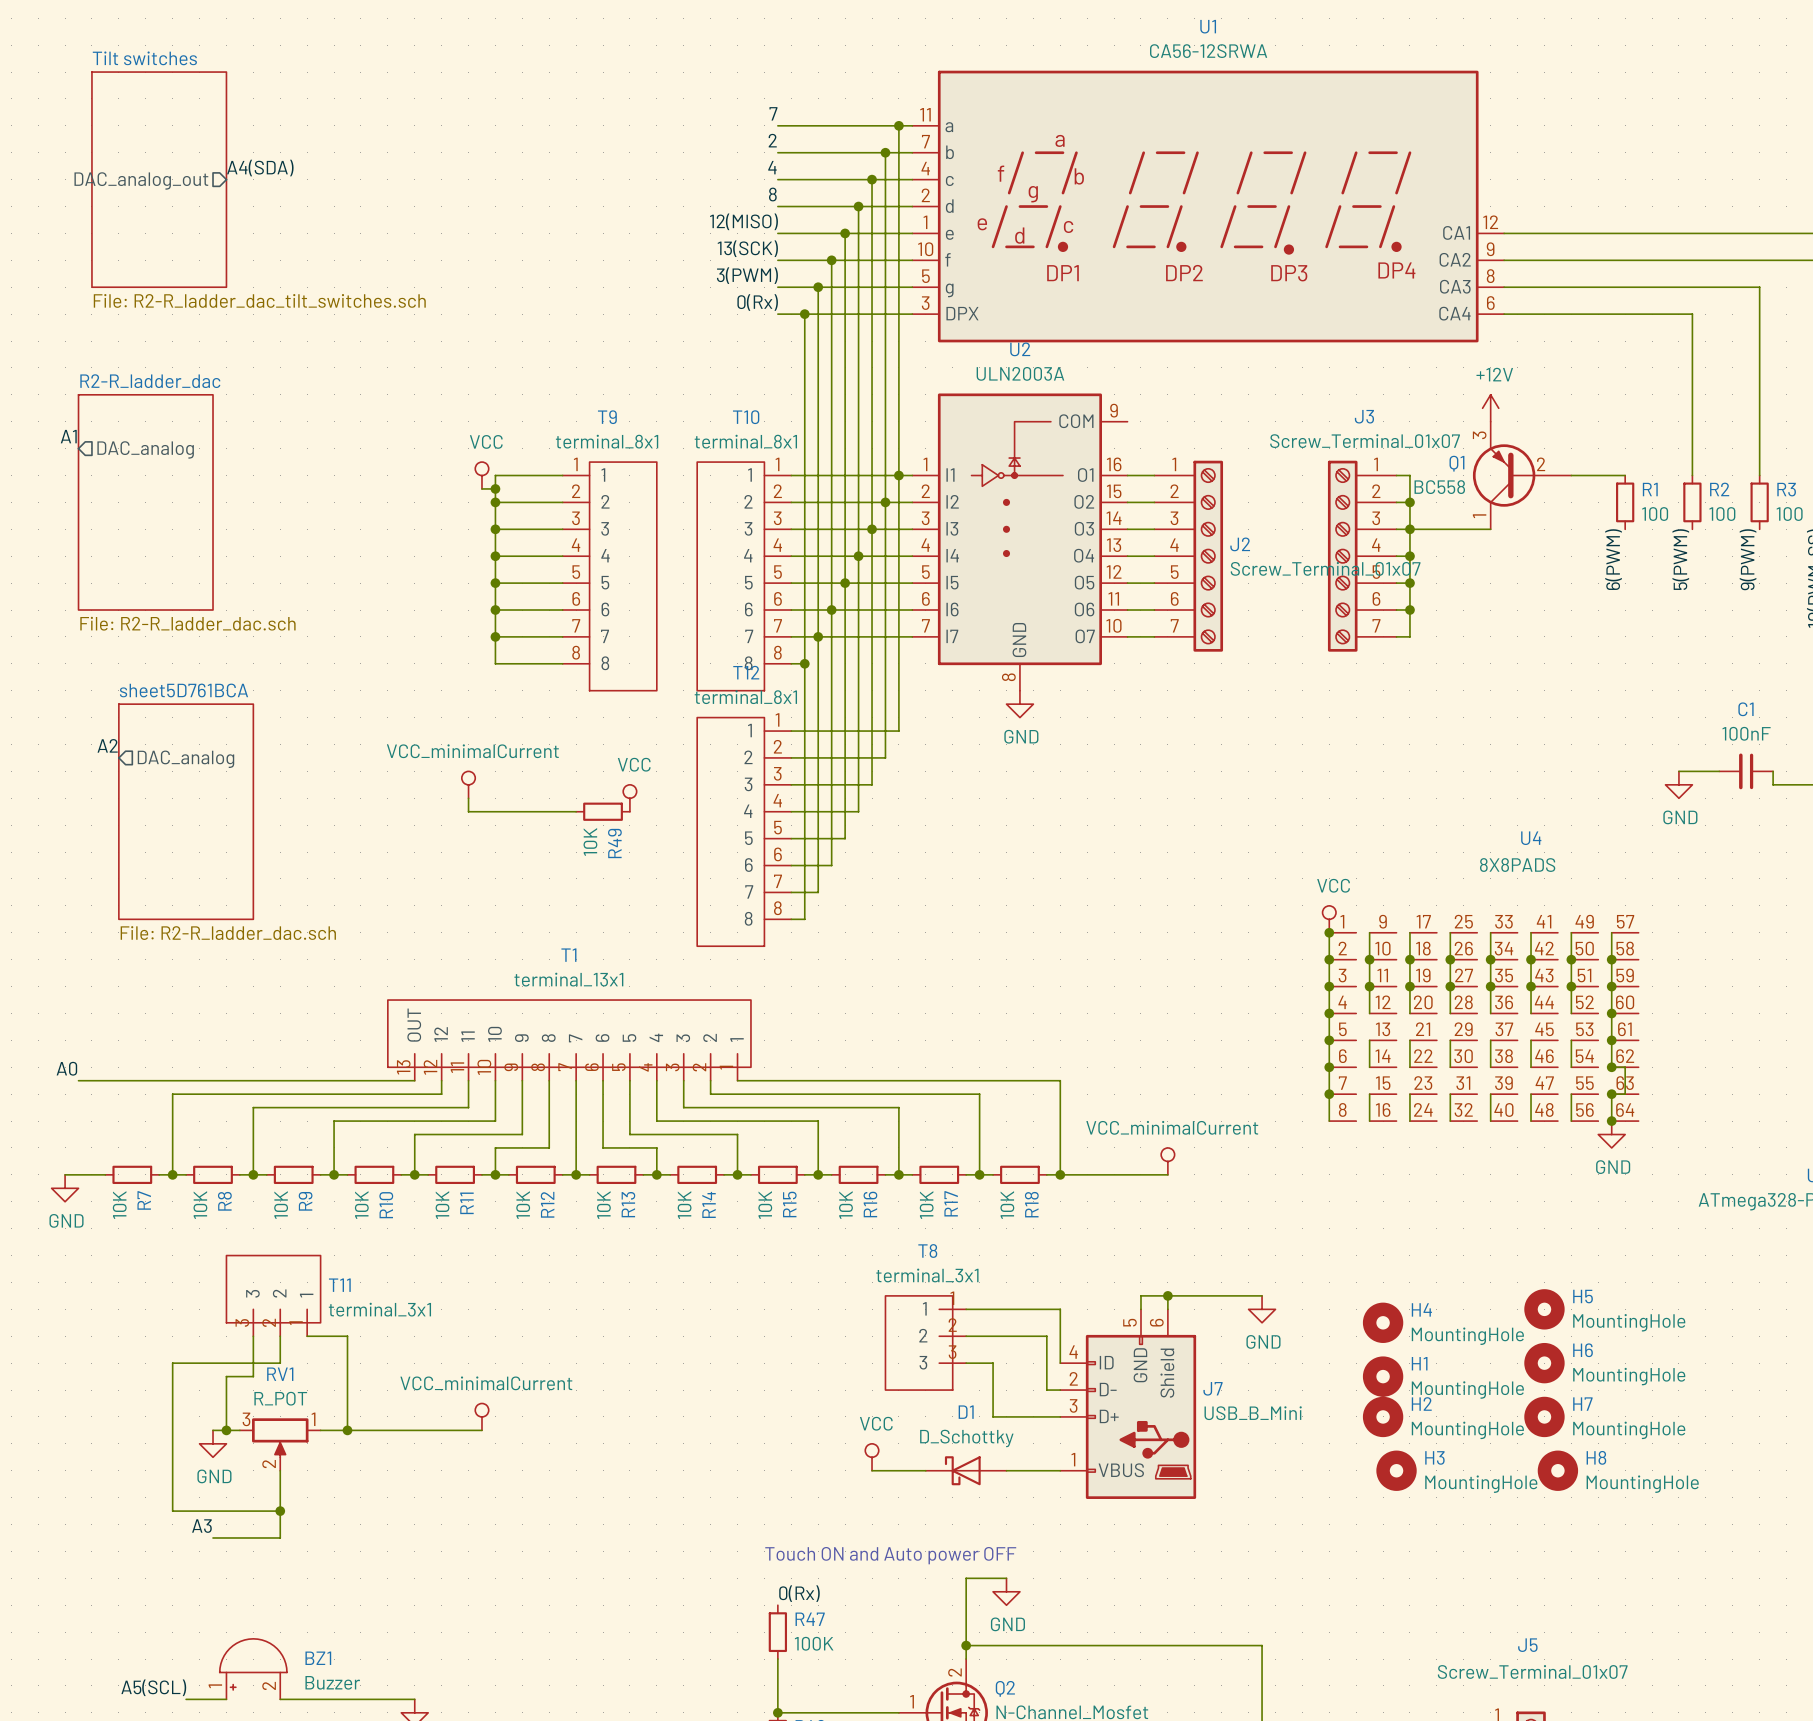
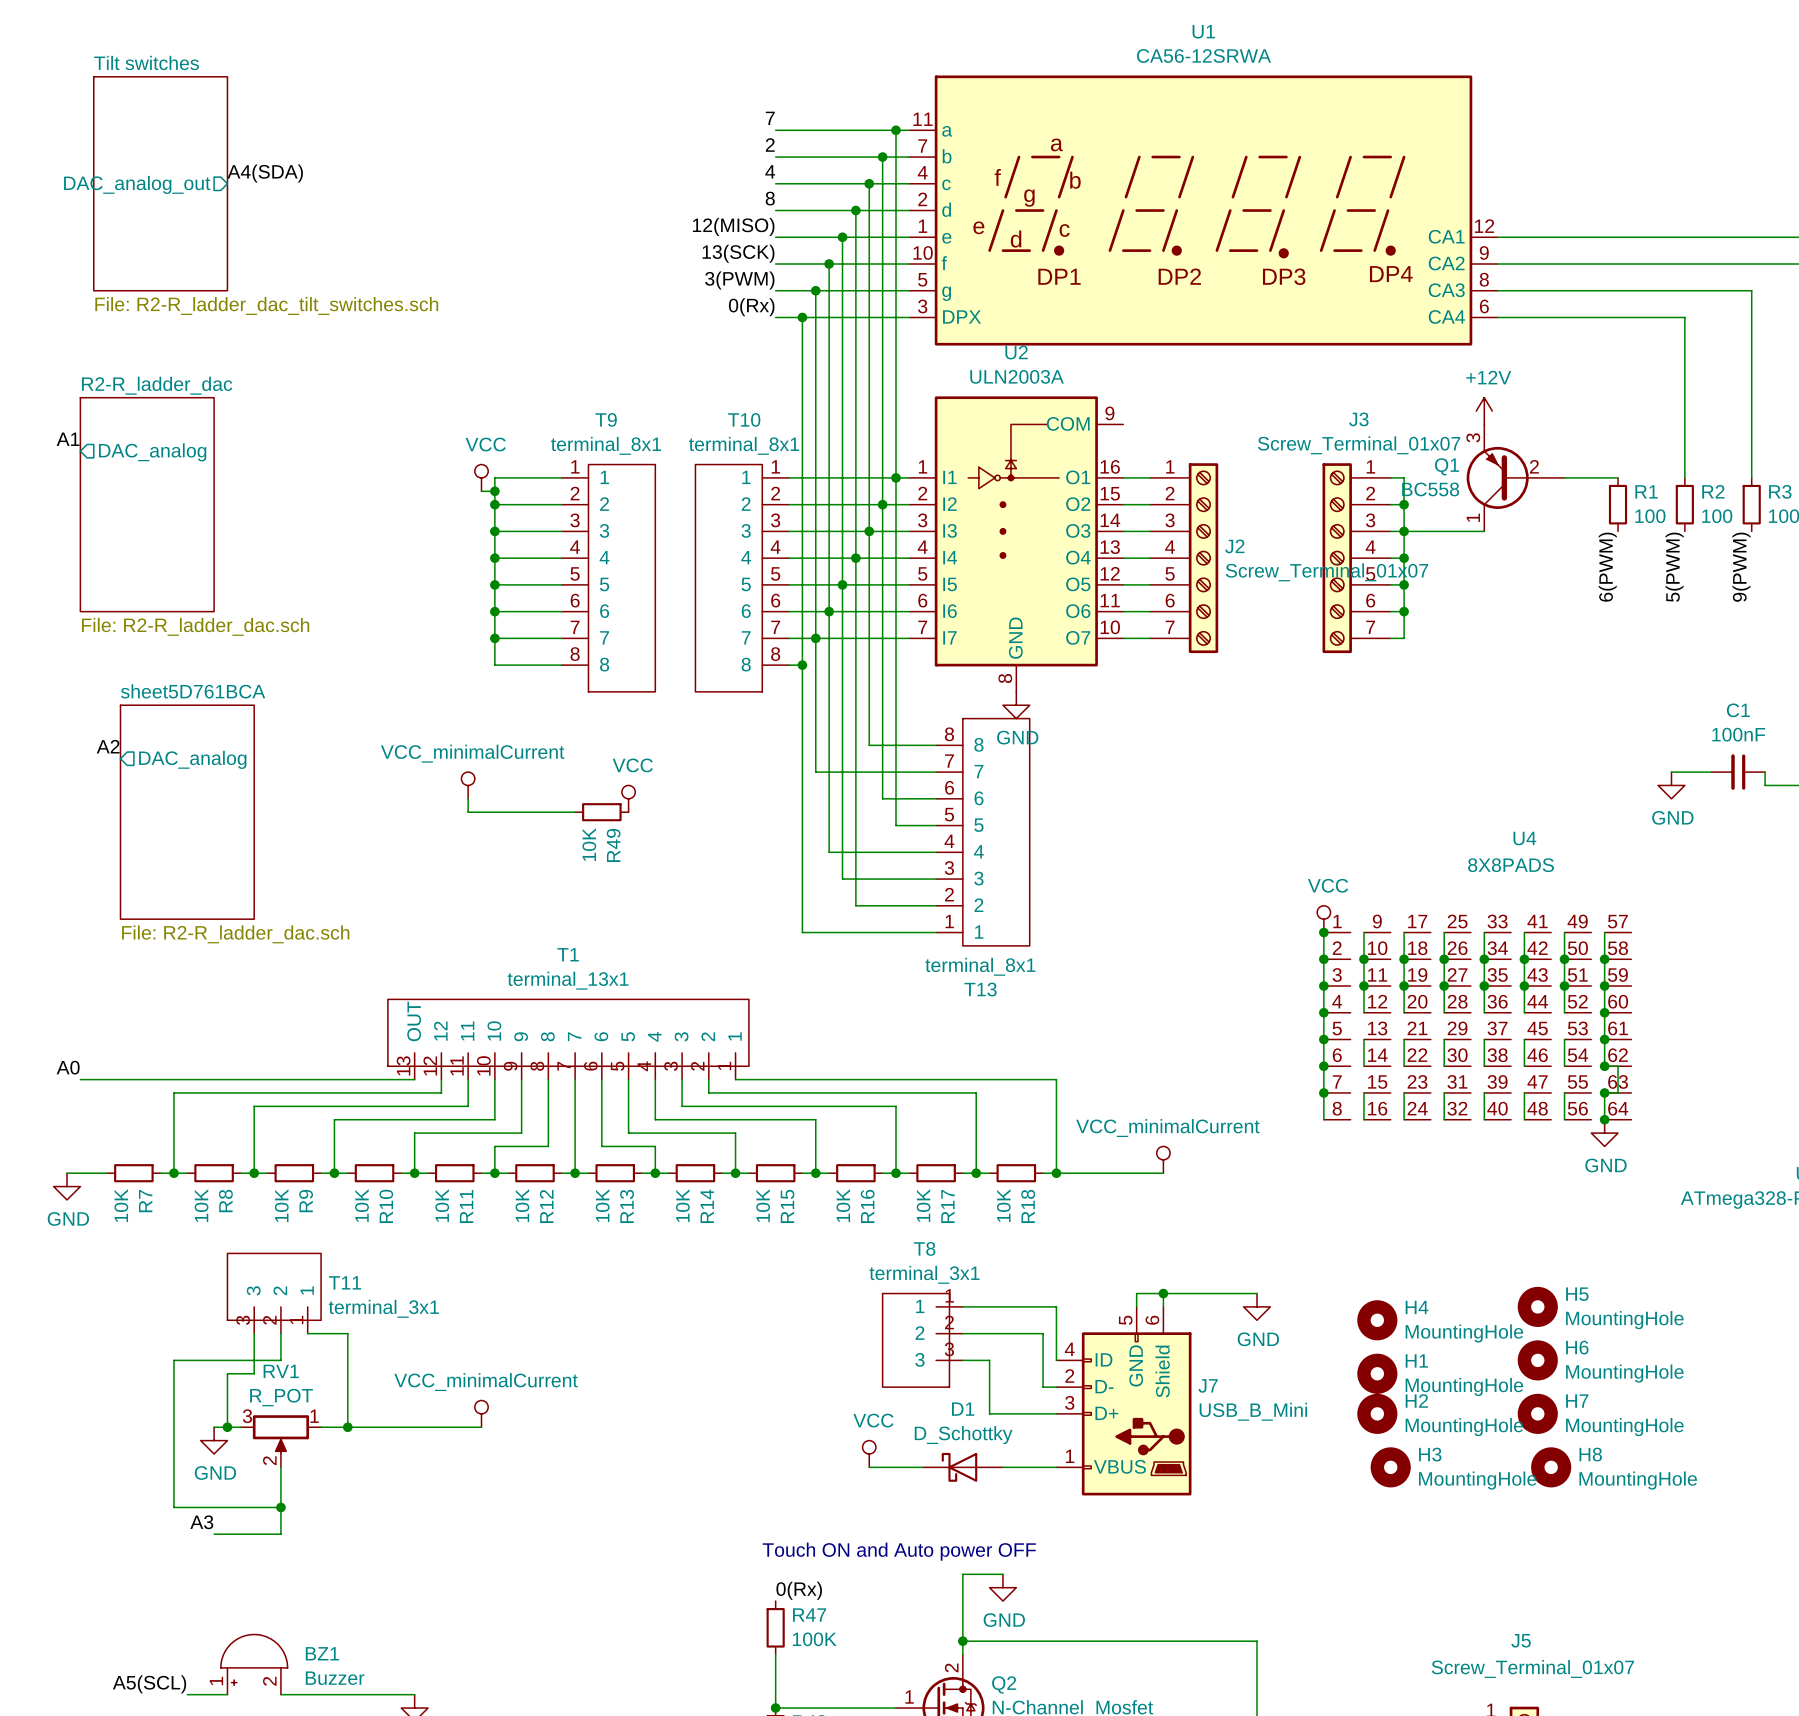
wire: (791, 731) (898, 731) -> (936, 825) (895, 825) (895, 731)
wire: (872, 744) (872, 784) (791, 784) -> (869, 745) (936, 745)
wire: (791, 757) (885, 757) -> (936, 798) (882, 798) (882, 758)
wire: (818, 771) (818, 892) (791, 892) -> (815, 772) (936, 772)
wire: (791, 811) (858, 811) -> (936, 905) (855, 905) (855, 812)
T12: terminal_8x1 (744, 831) -> none
T13: none -> terminal_8x1 (982, 832)
wire: (791, 838) (845, 838) -> (936, 879) (842, 879) (842, 838)
wire: (831, 852) (831, 865) (791, 865) -> (829, 852) (936, 852)
wire: (791, 919) (804, 919) -> (936, 932) (802, 932) (802, 919)

